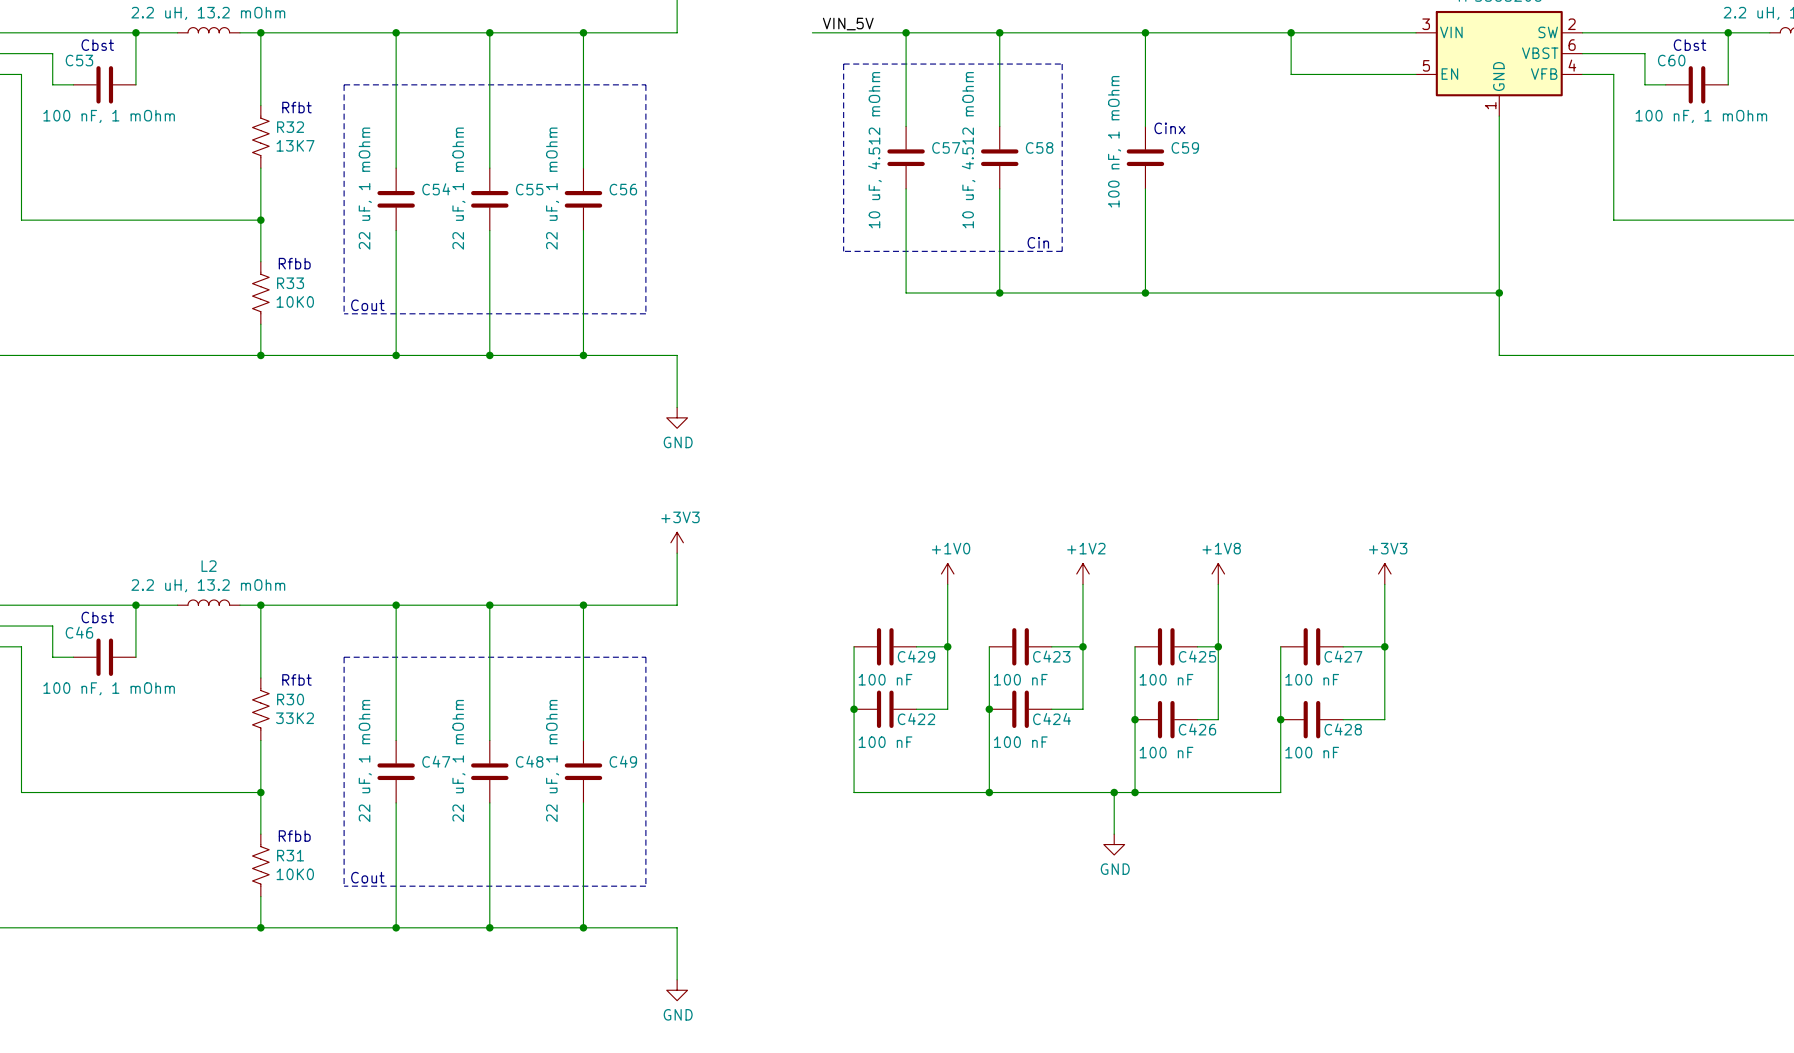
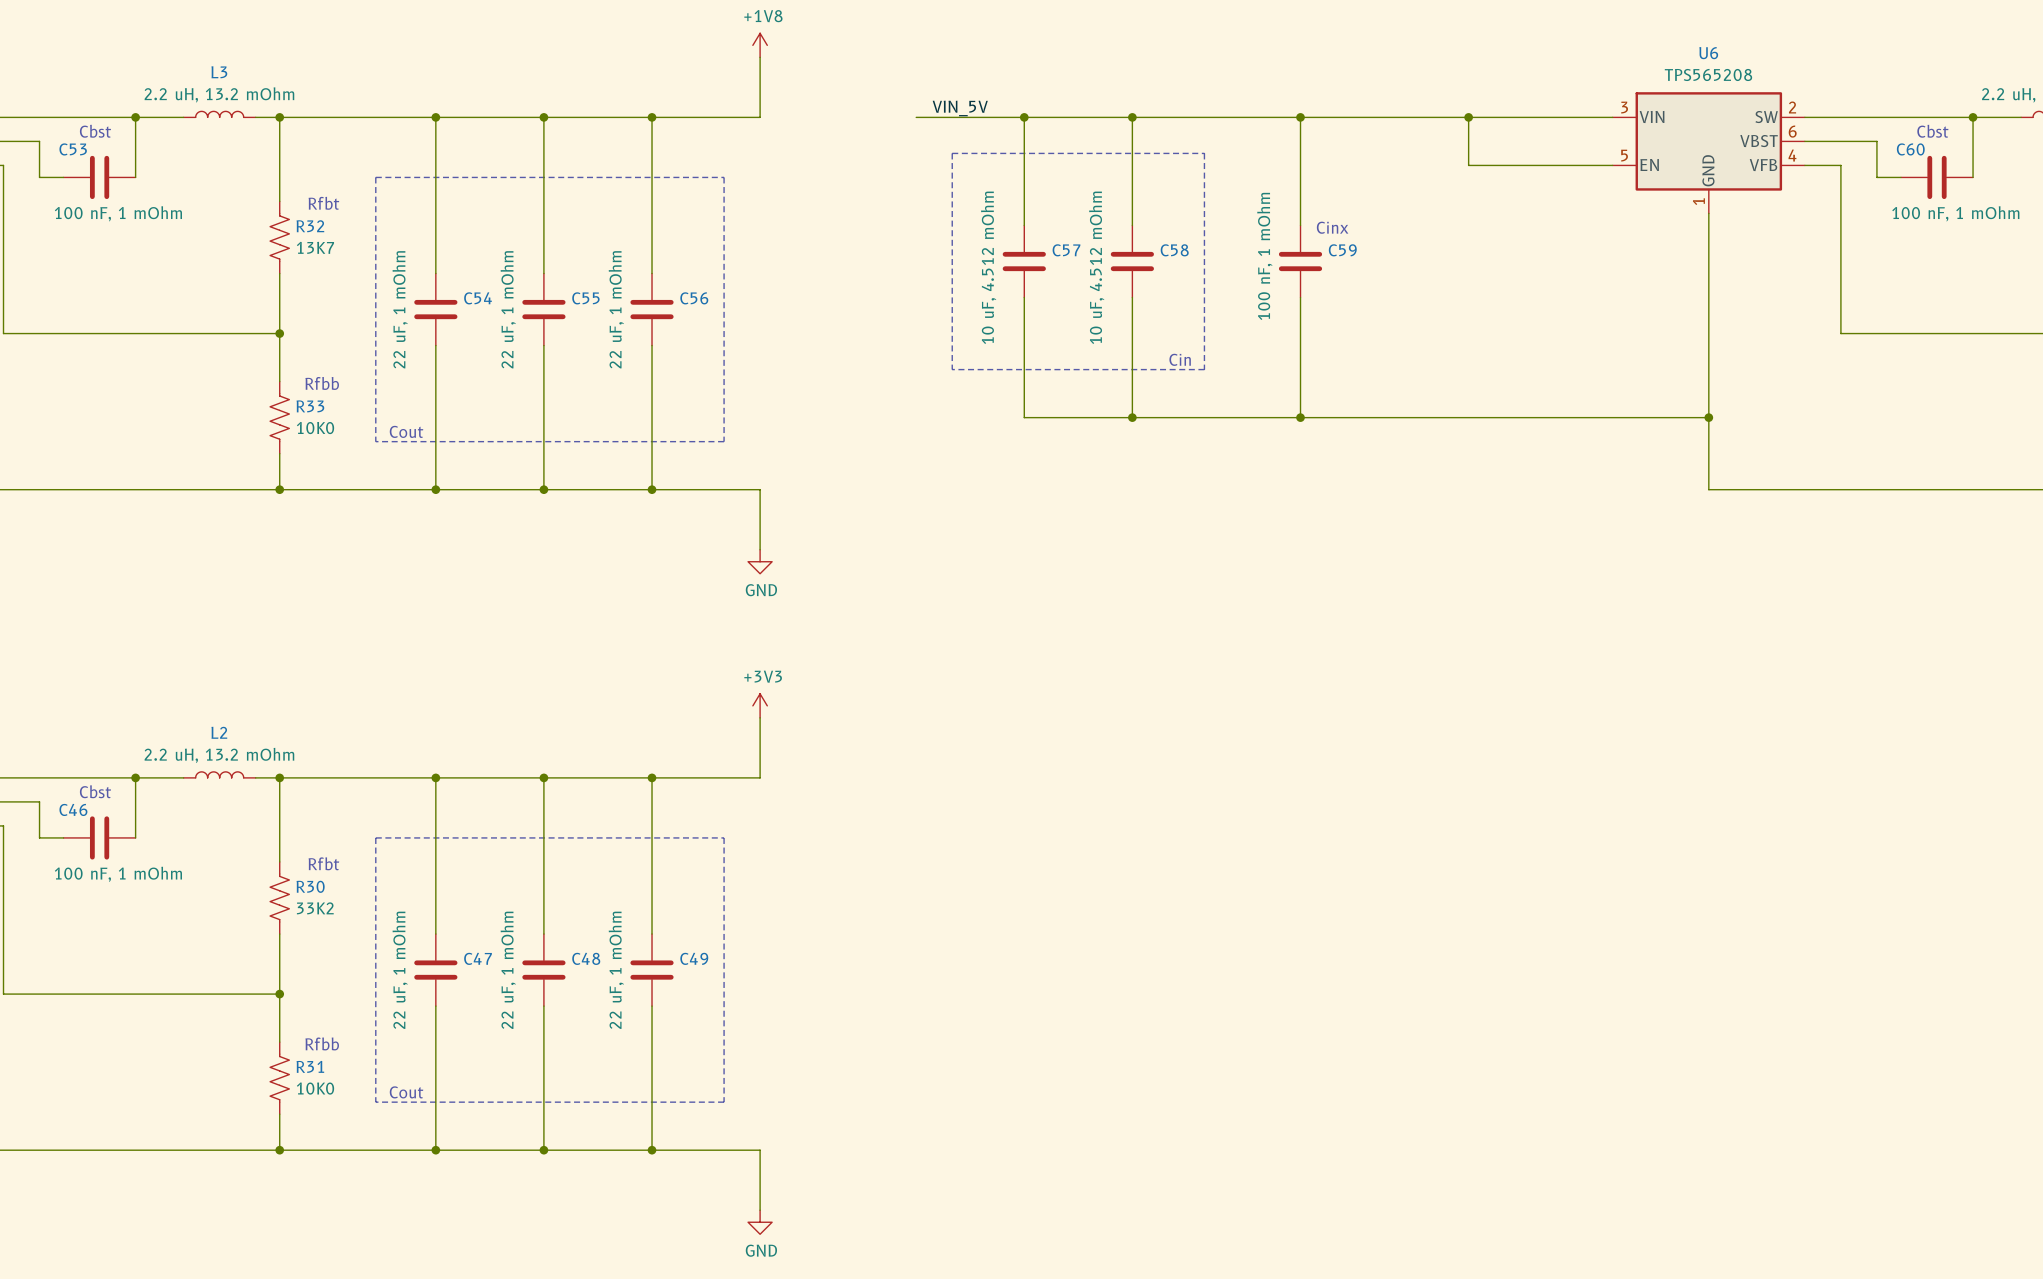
power symbol: +1V0 (947, 573) -> none
power symbol: +1V2 (1082, 573) -> none
power symbol: +1V8 (1218, 573) -> none
power symbol: +3V3 (1384, 573) -> none
wire: (947, 584) (947, 709) (916, 709) -> none
wire: (1082, 584) (1082, 709) (1051, 709) -> none
wire: (1218, 584) (1218, 719) (1197, 719) -> none
wire: (1384, 584) (1384, 719) (1343, 719) -> none
wire: (854, 646) (854, 792) (1280, 792) (1280, 646) -> none
C429: 100 nF (885, 646) -> none
wire: (916, 646) (947, 646) -> none
junction: (947, 646) -> none
wire: (989, 646) (989, 792) -> none
C423: 100 nF (1020, 646) -> none
wire: (1051, 646) (1082, 646) -> none
junction: (1082, 646) -> none
wire: (1135, 646) (1135, 792) -> none
C425: 100 nF (1166, 646) -> none
wire: (1197, 646) (1218, 646) -> none
junction: (1218, 646) -> none
C427: 100 nF (1311, 646) -> none
wire: (1343, 646) (1384, 646) -> none
junction: (1384, 646) -> none
junction: (854, 709) -> none
C422: 100 nF (885, 709) -> none
junction: (989, 709) -> none
C424: 100 nF (1020, 709) -> none
junction: (1135, 719) -> none
C426: 100 nF (1166, 719) -> none
junction: (1280, 719) -> none
C428: 100 nF (1311, 719) -> none
junction: (989, 792) -> none
wire: (1114, 792) (1114, 834) -> none
junction: (1114, 792) -> none
junction: (1135, 792) -> none
power symbol: GND (1114, 844) -> none

